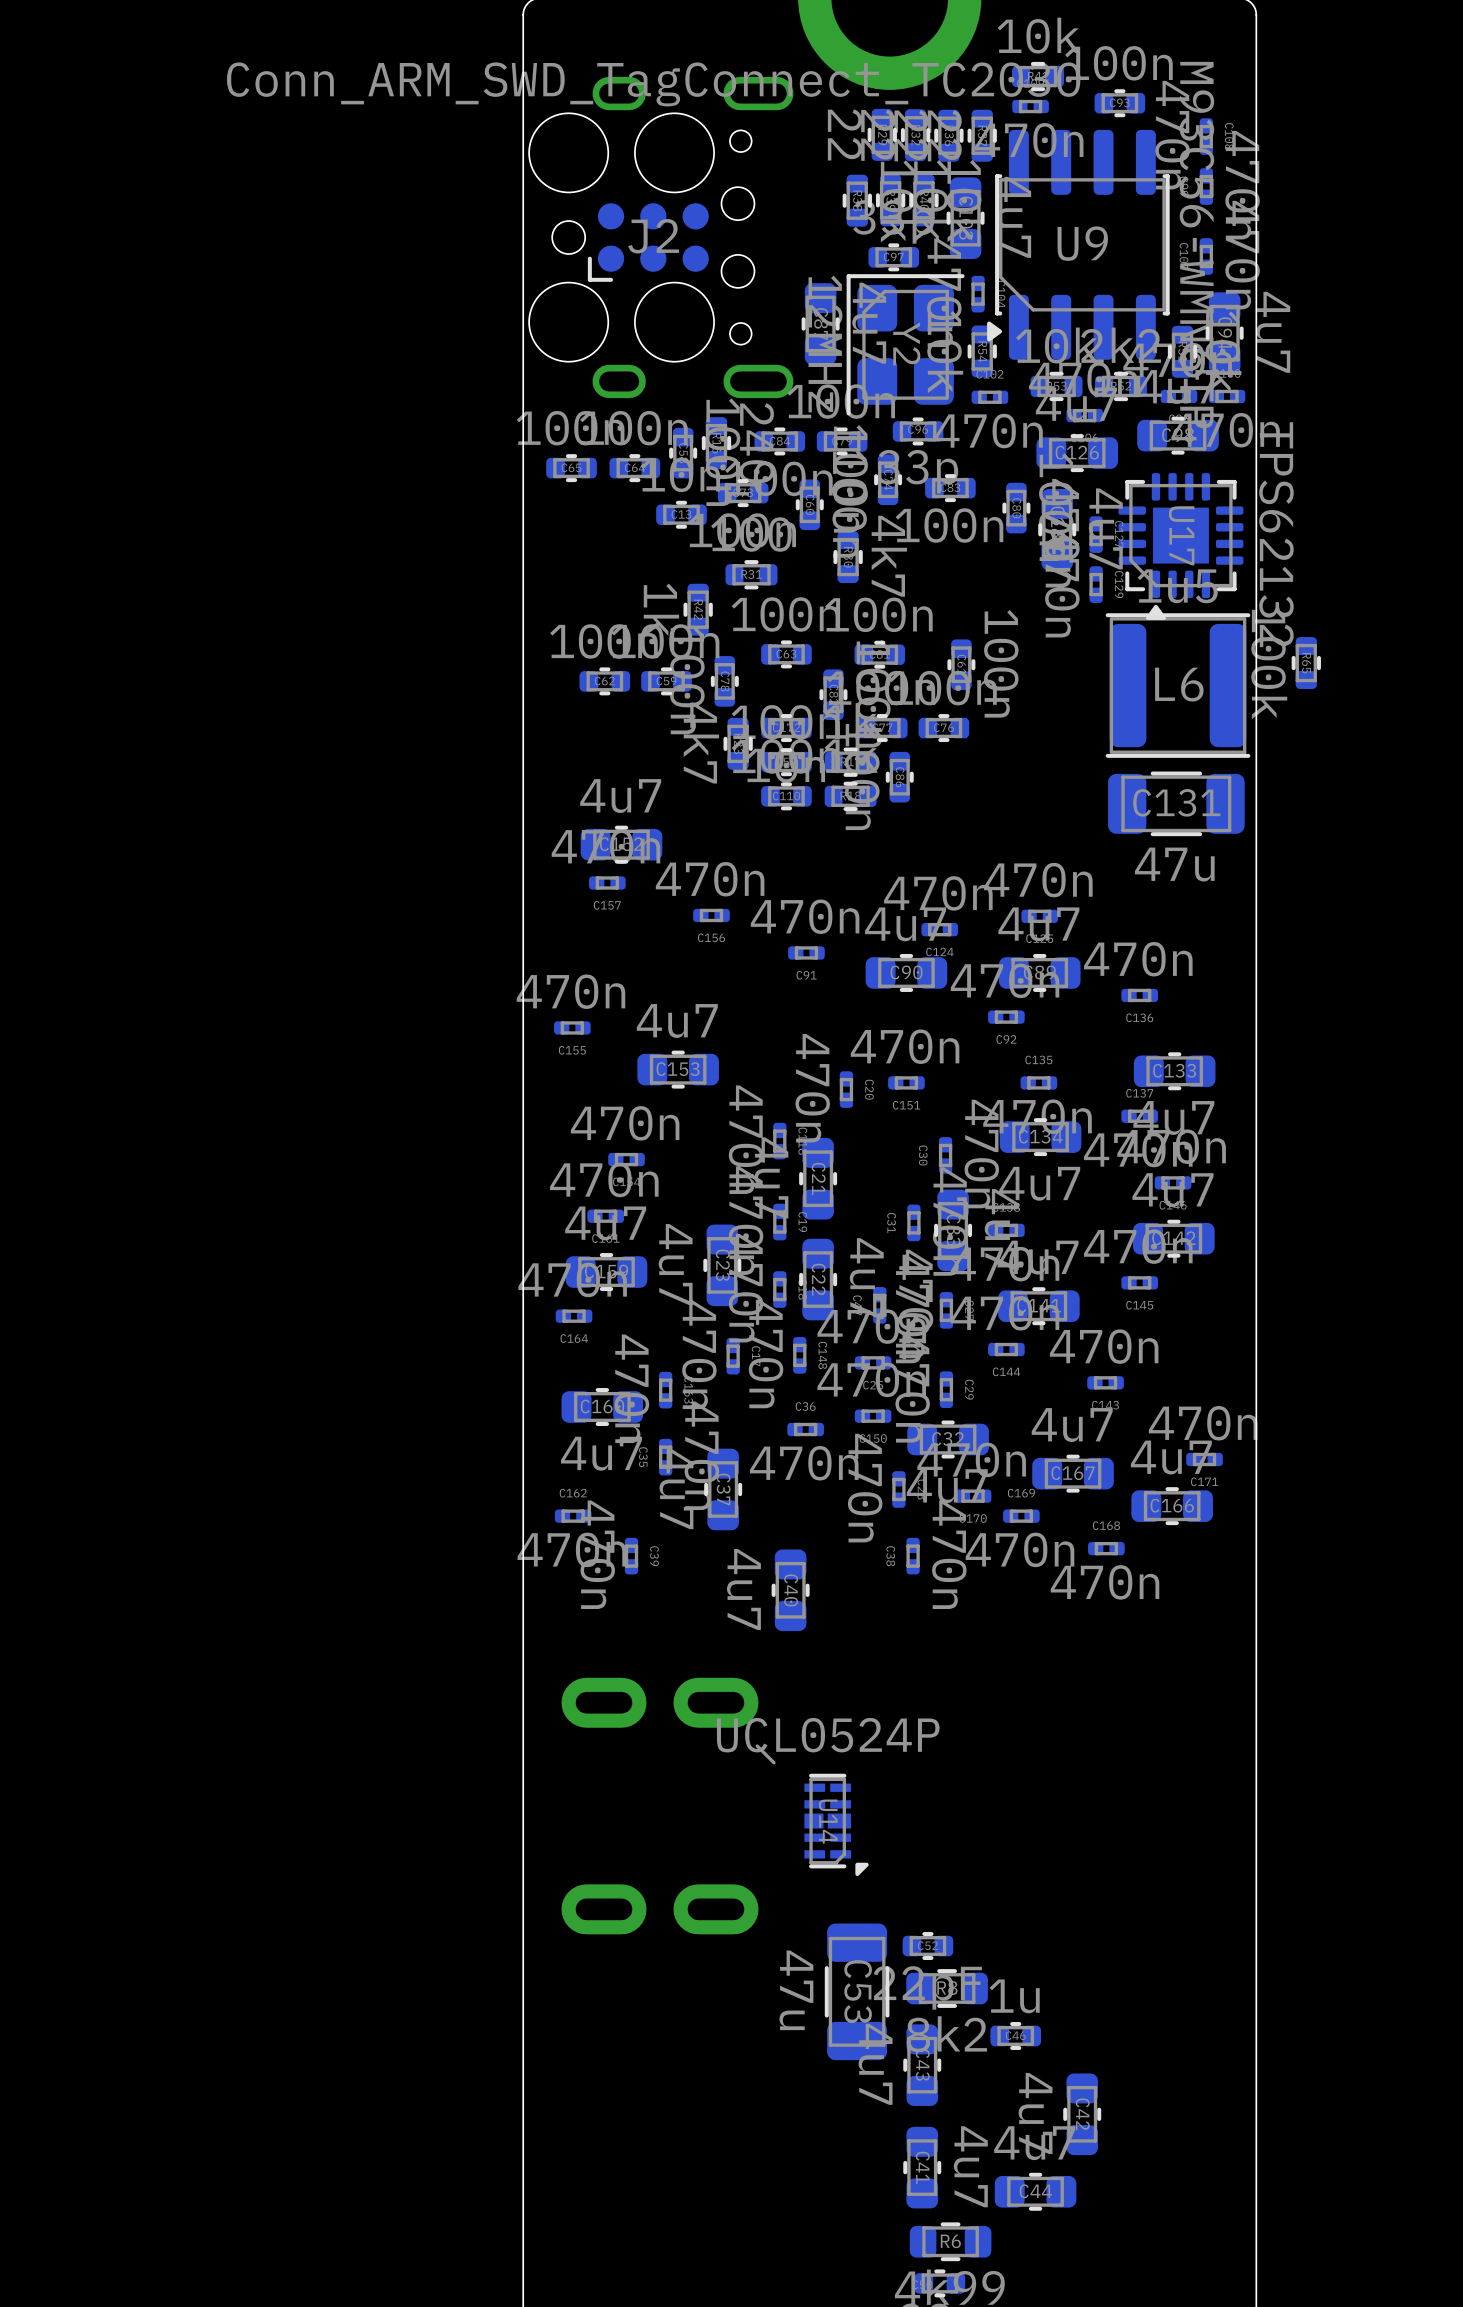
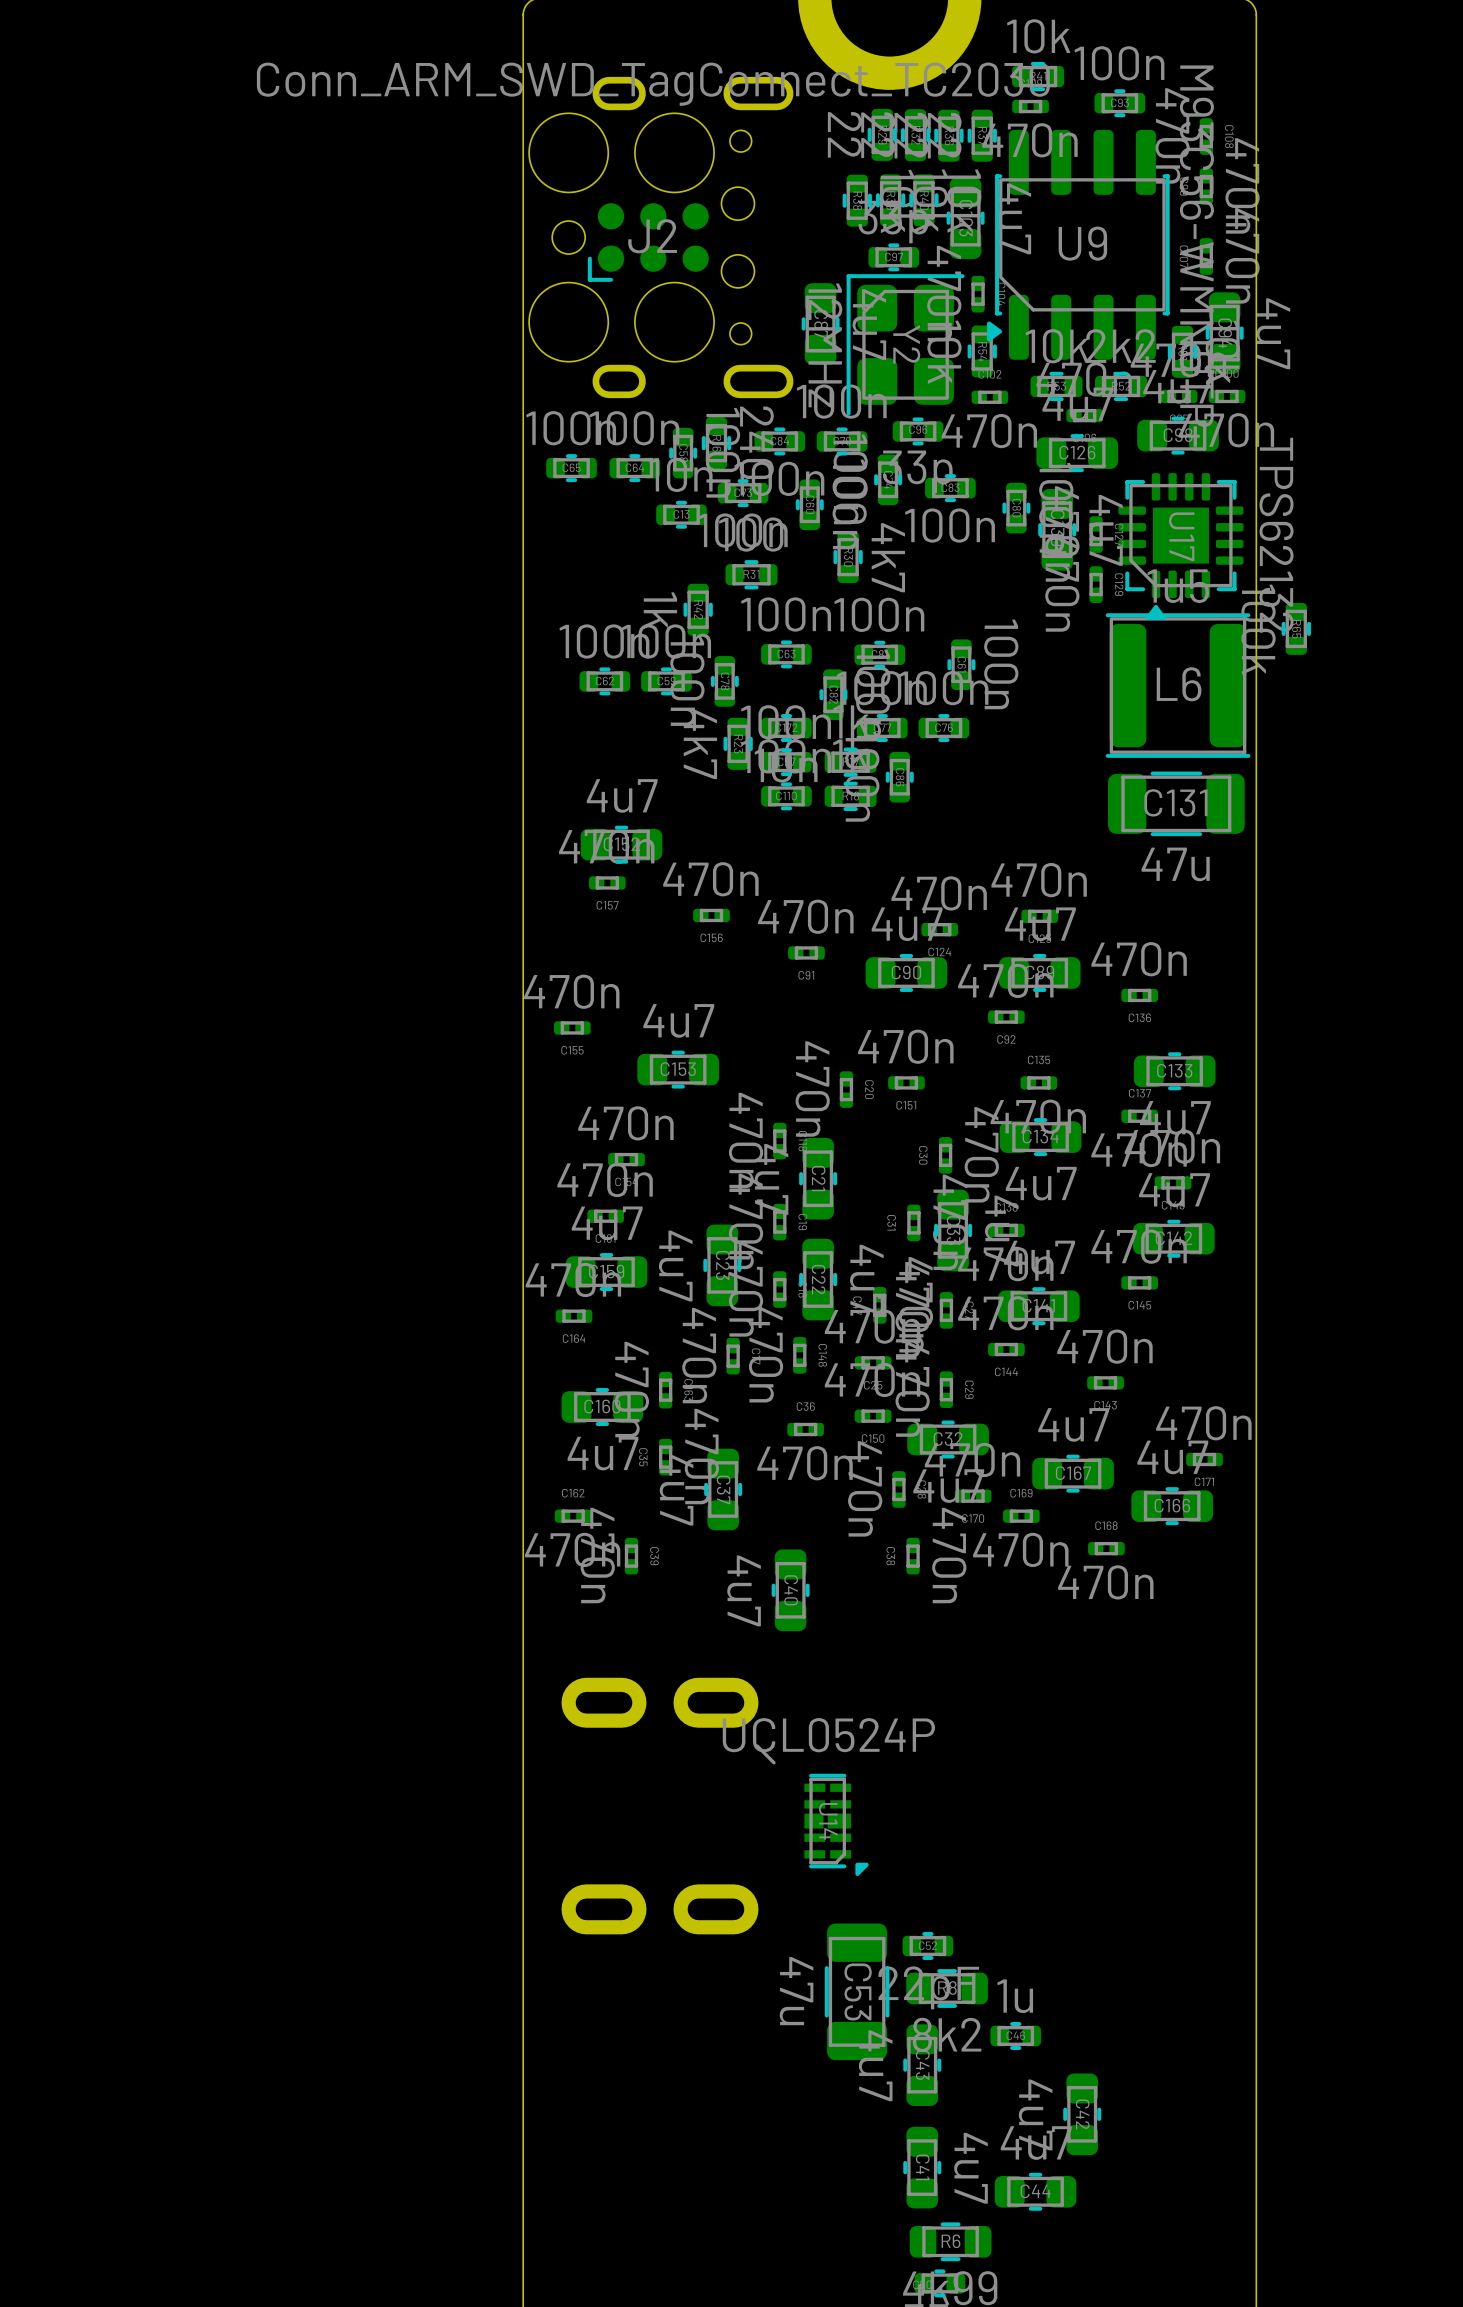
R65 position: (1306, 663) -> (1296, 628)

